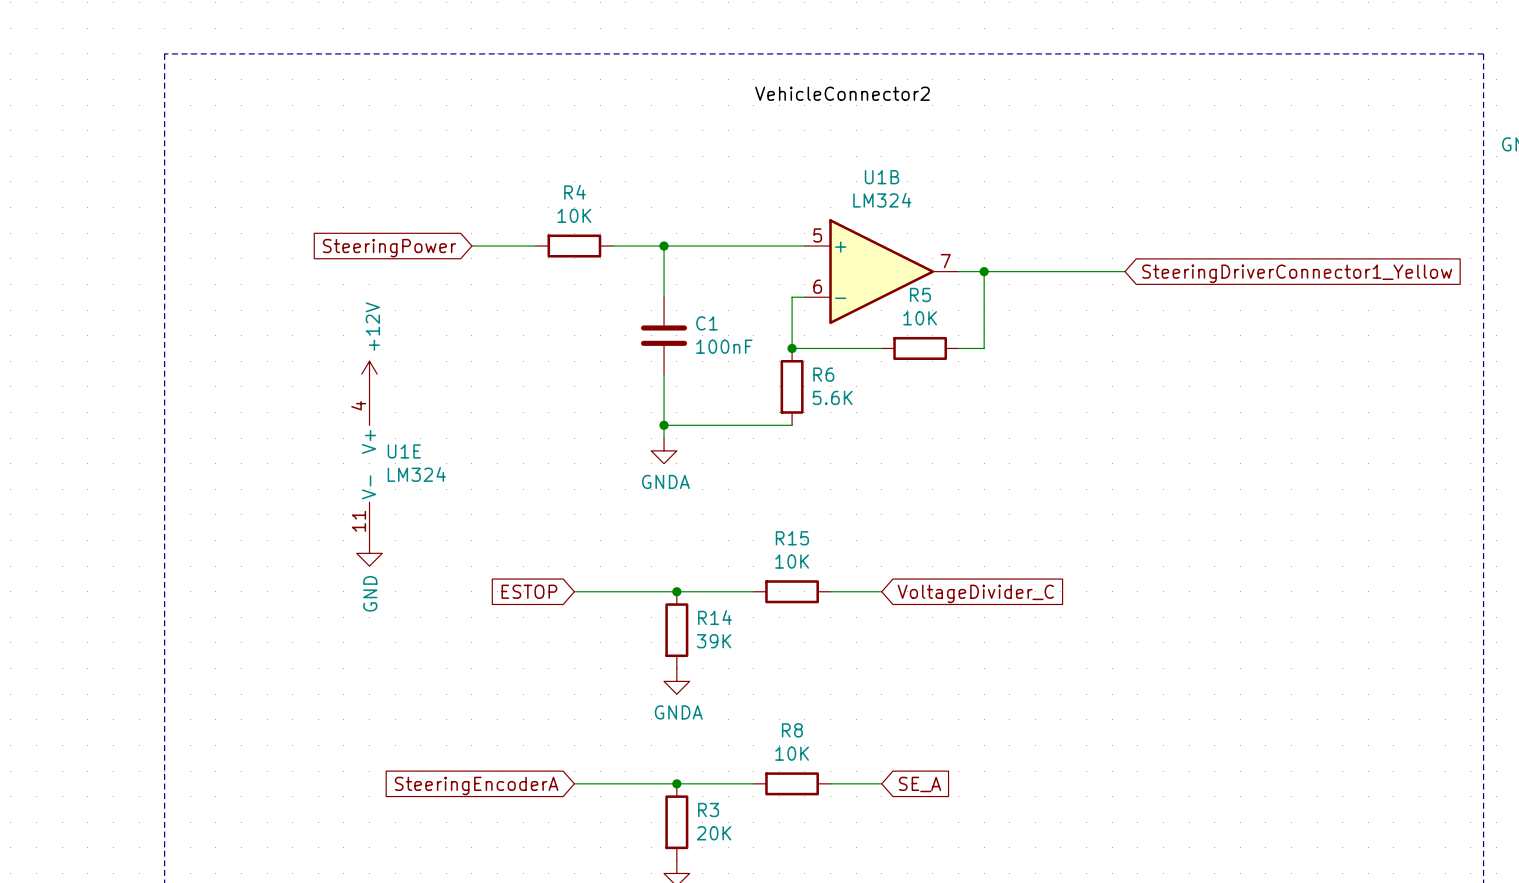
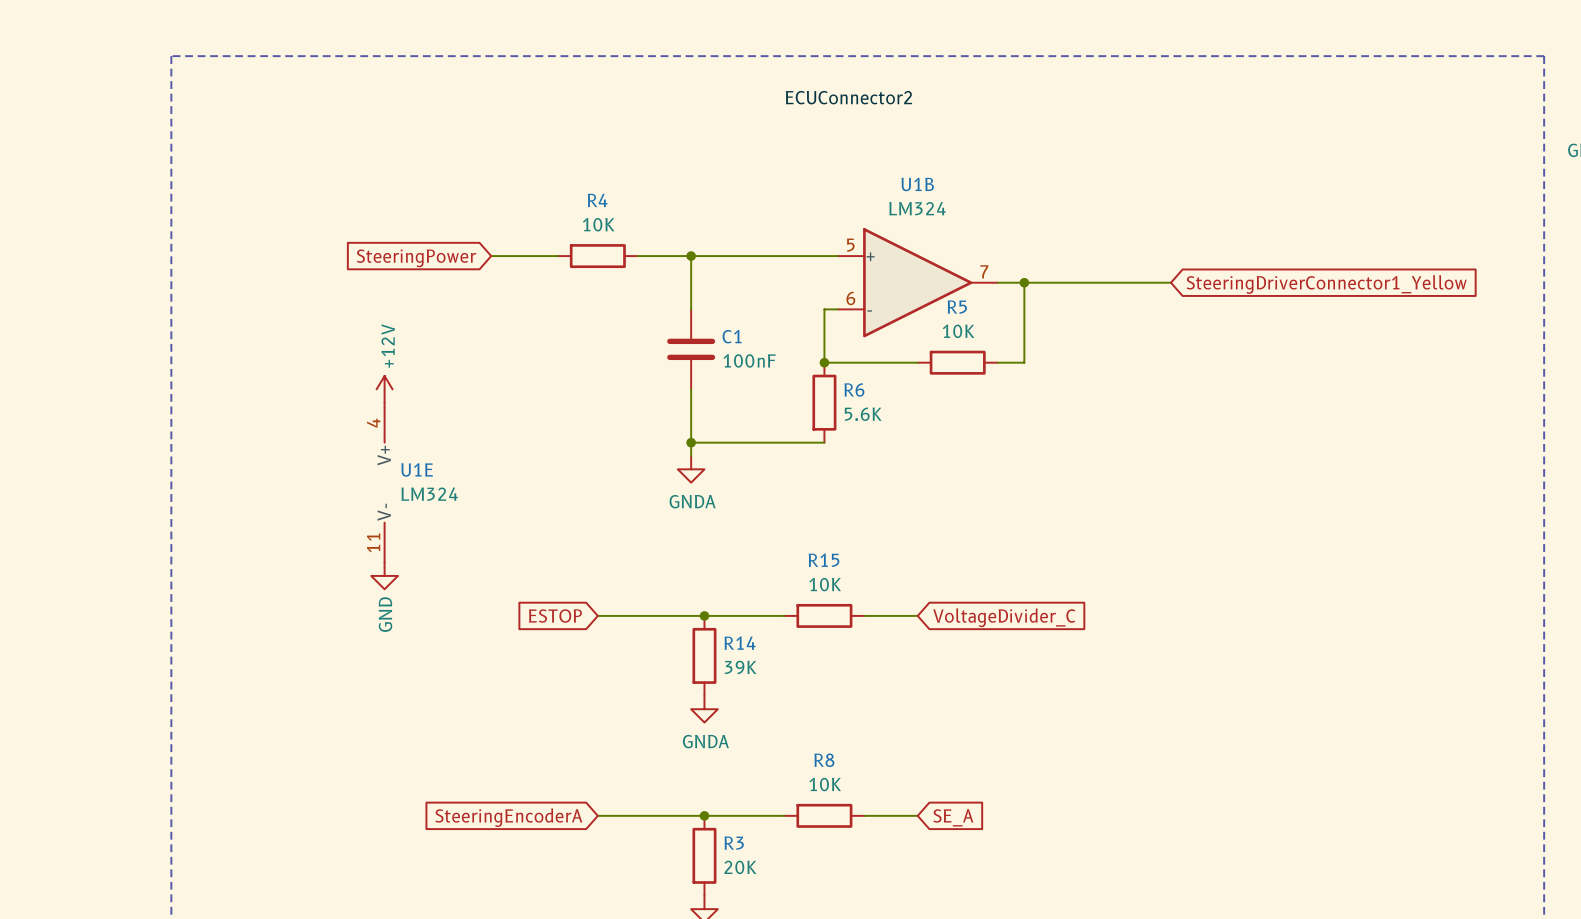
label: VehicleConnector2 (842, 93) -> ECUConnector2 (848, 97)

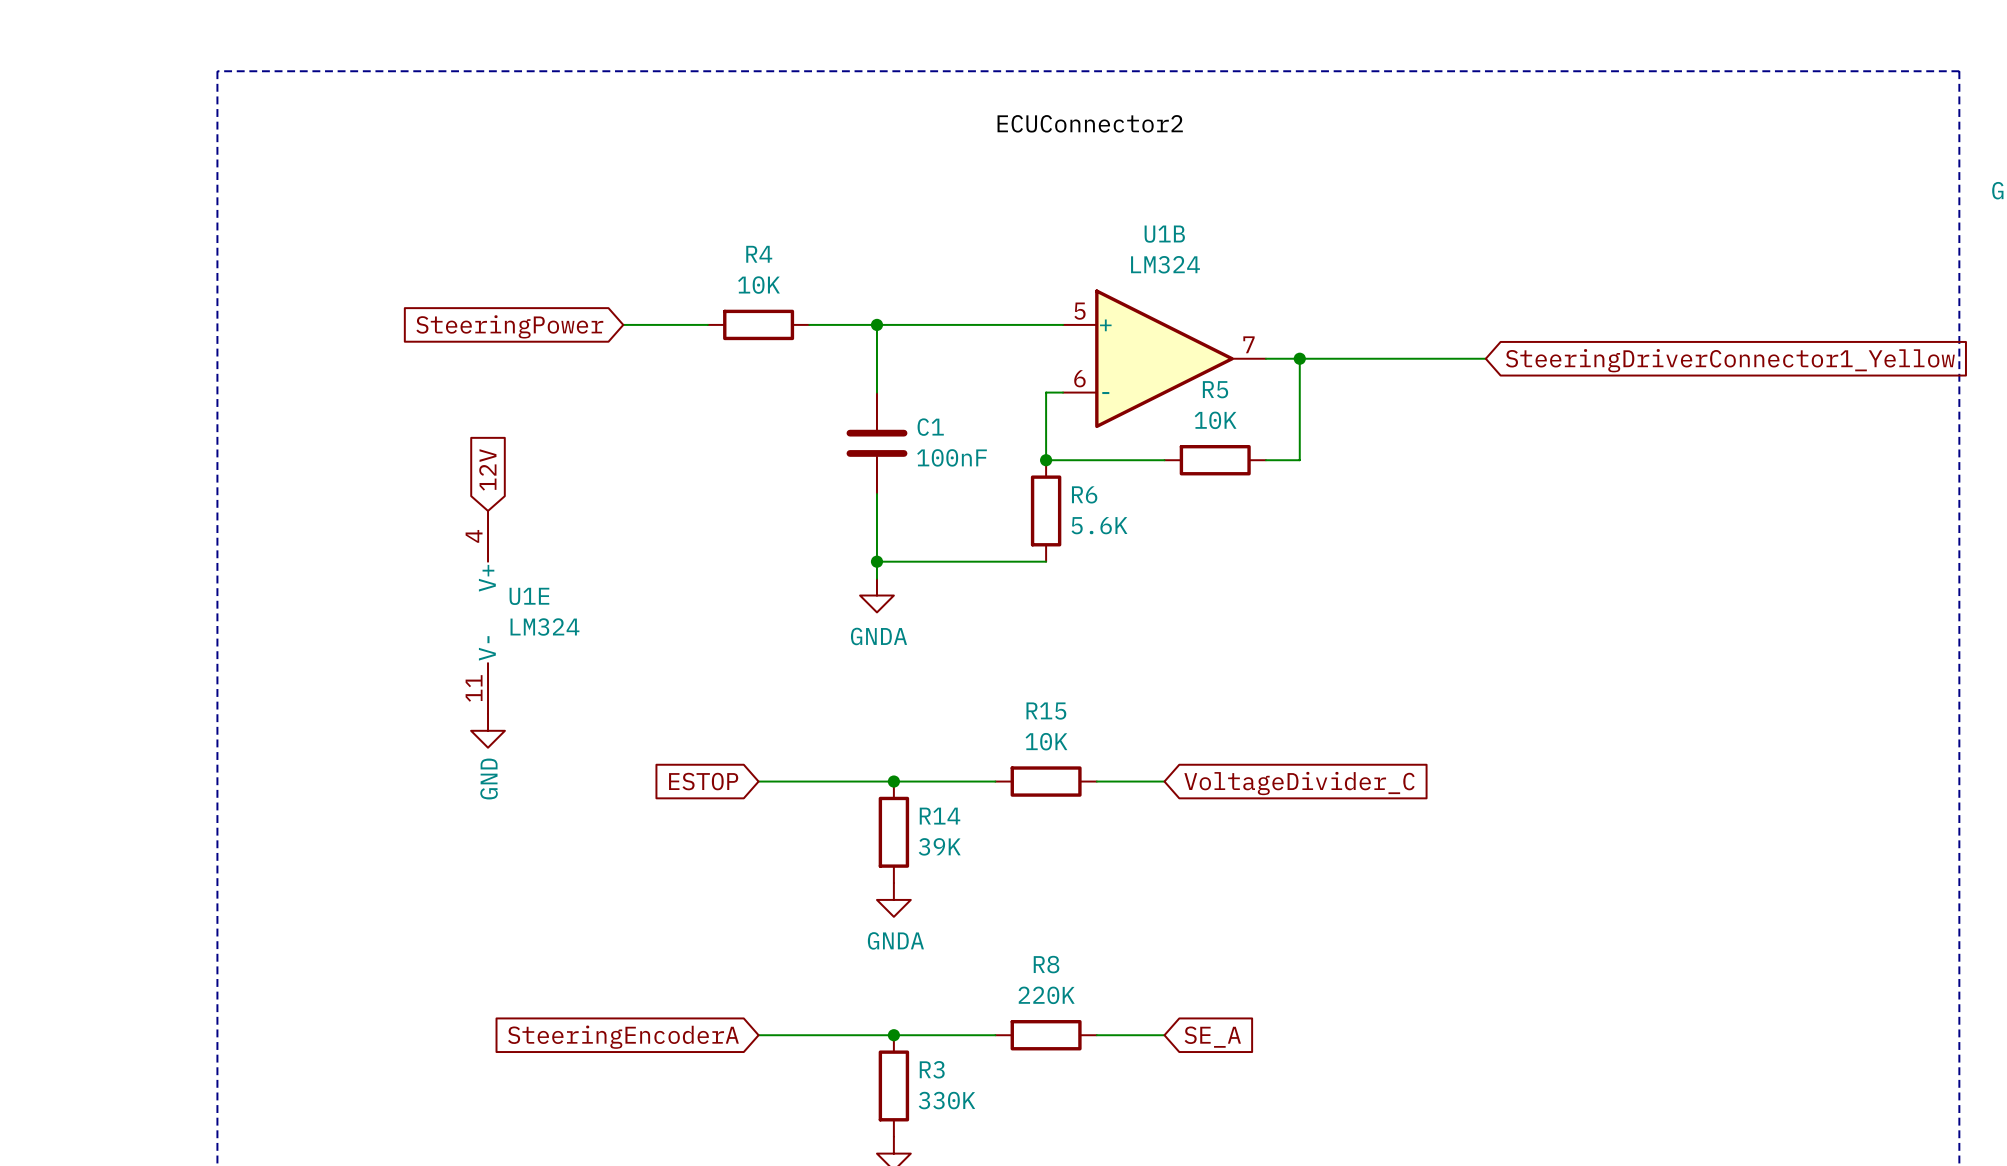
global label: none -> 12V (487, 469)
power symbol: +12V (384, 389) -> none
R8 value: 10K (825, 784) -> 220K (1046, 995)
R3 value: 20K (740, 867) -> 330K (946, 1100)

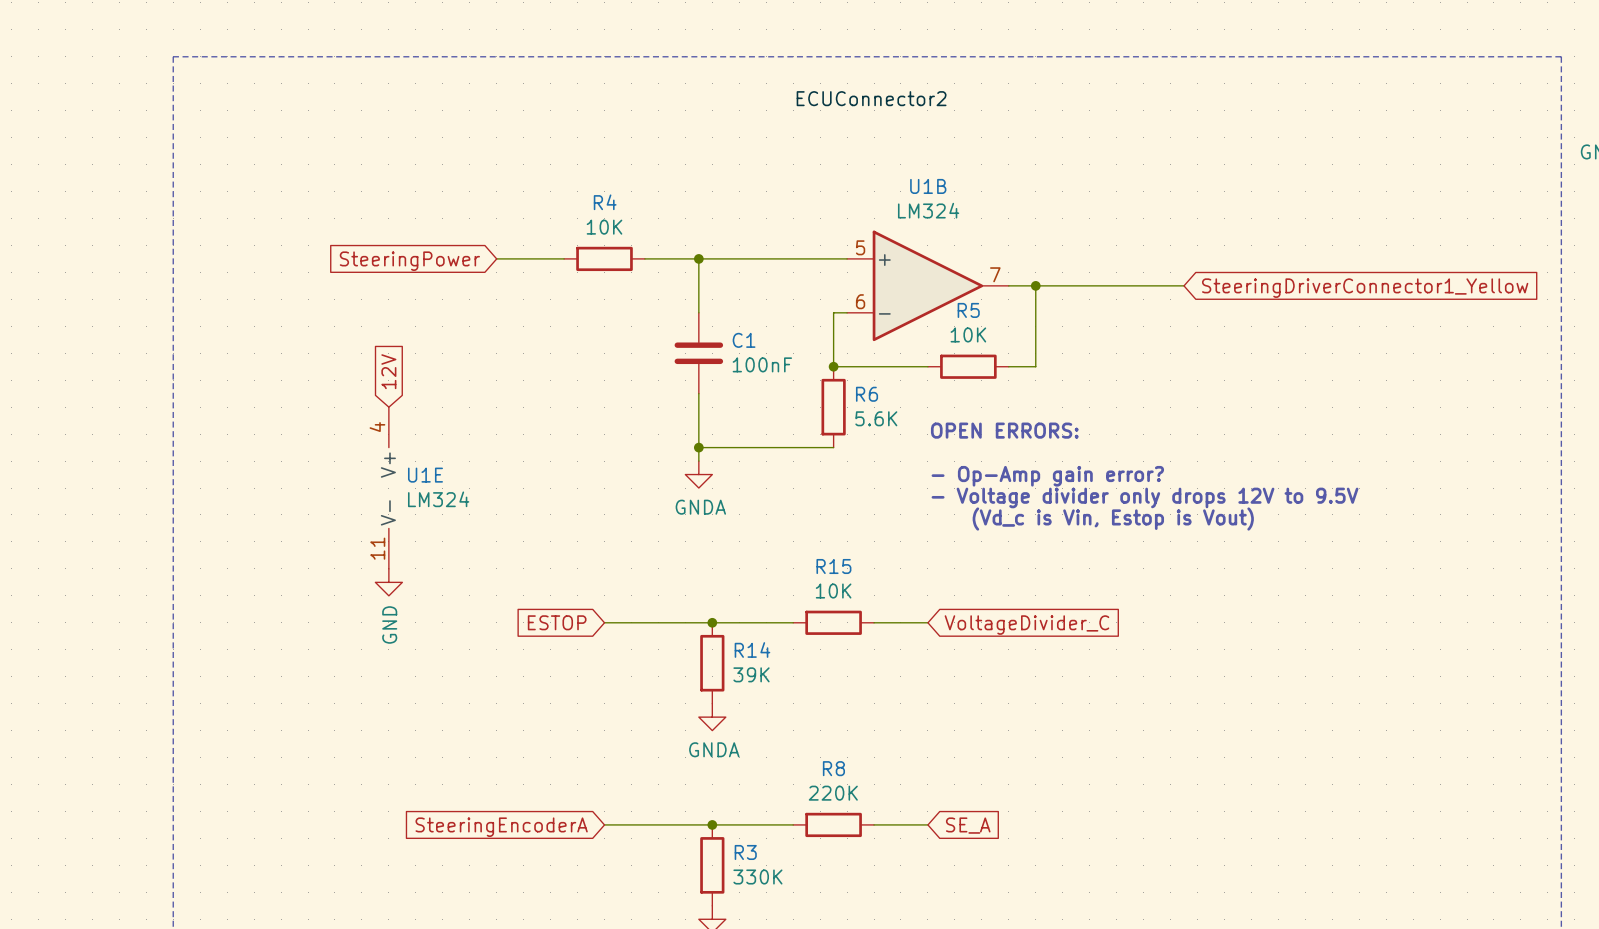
text: none -> OPEN ERRORS: (1004, 430)
text: none -> - Op-Amp gain error? (1047, 476)
text: none -> - Voltage divider only drops 12V to 9.5V (1145, 497)
text: none -> (Vd_c is Vin, Estop is Vout) (1113, 519)

